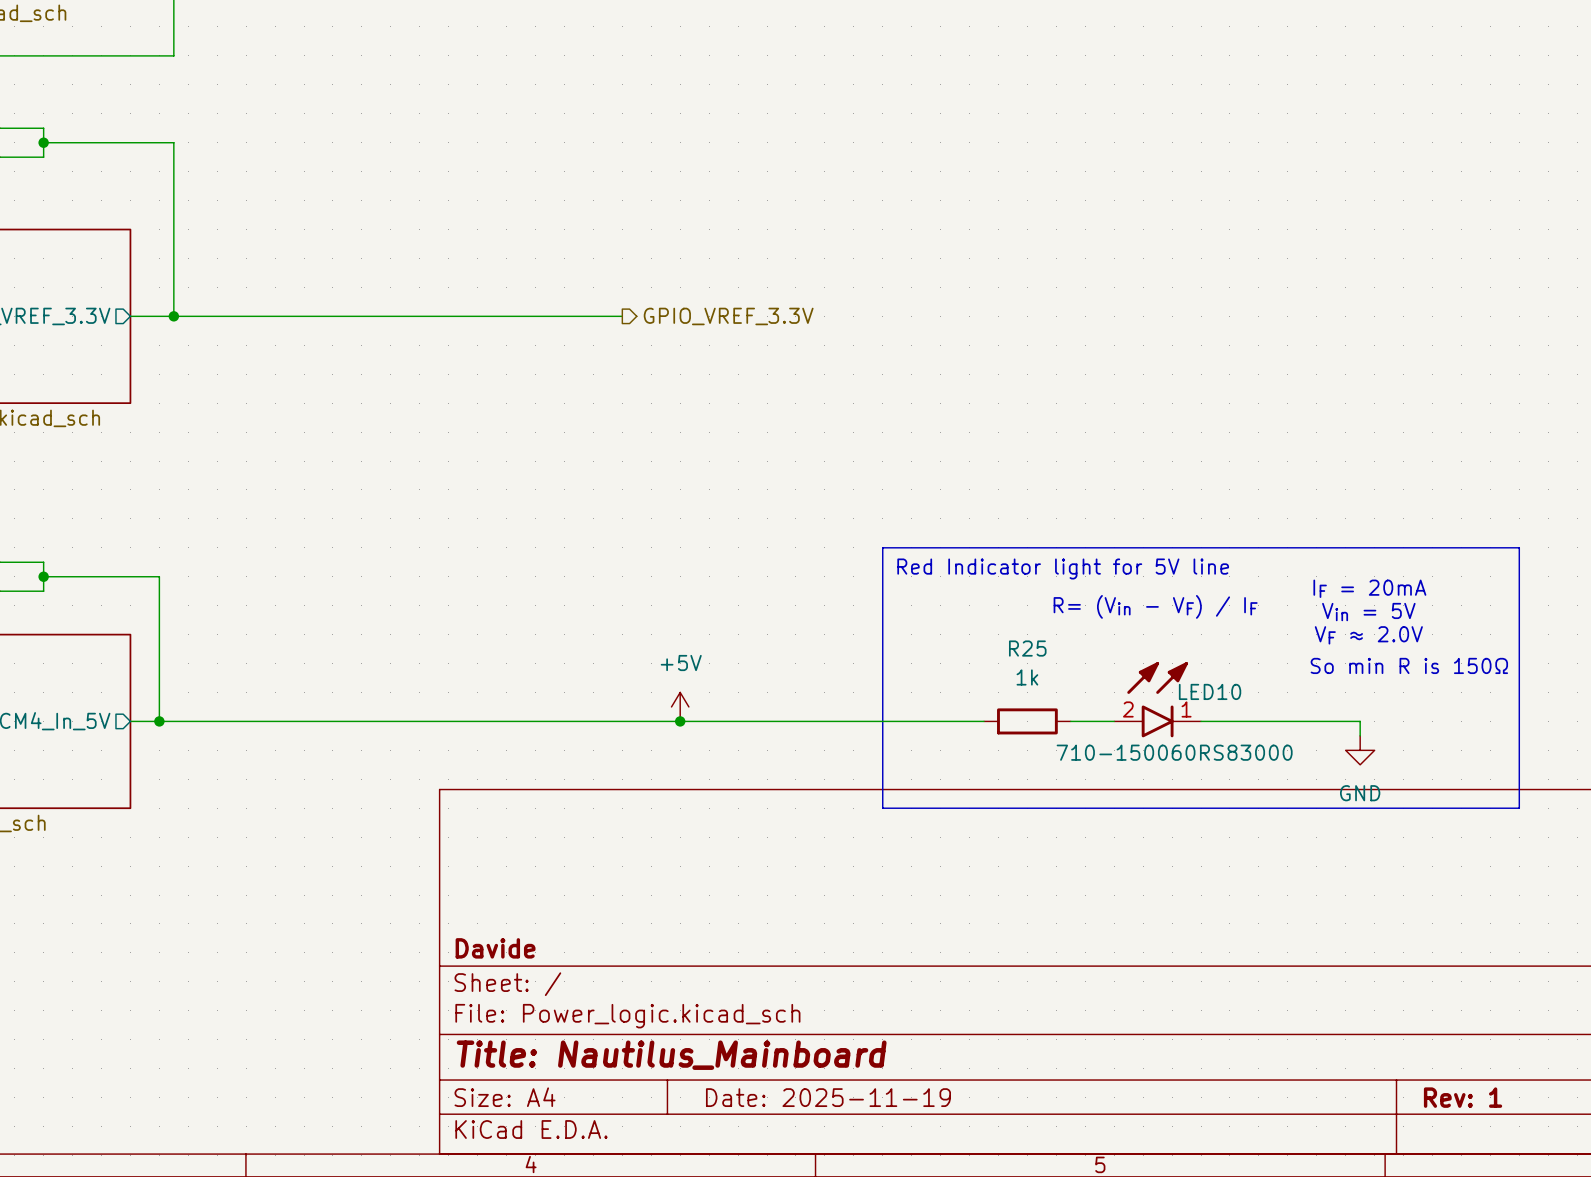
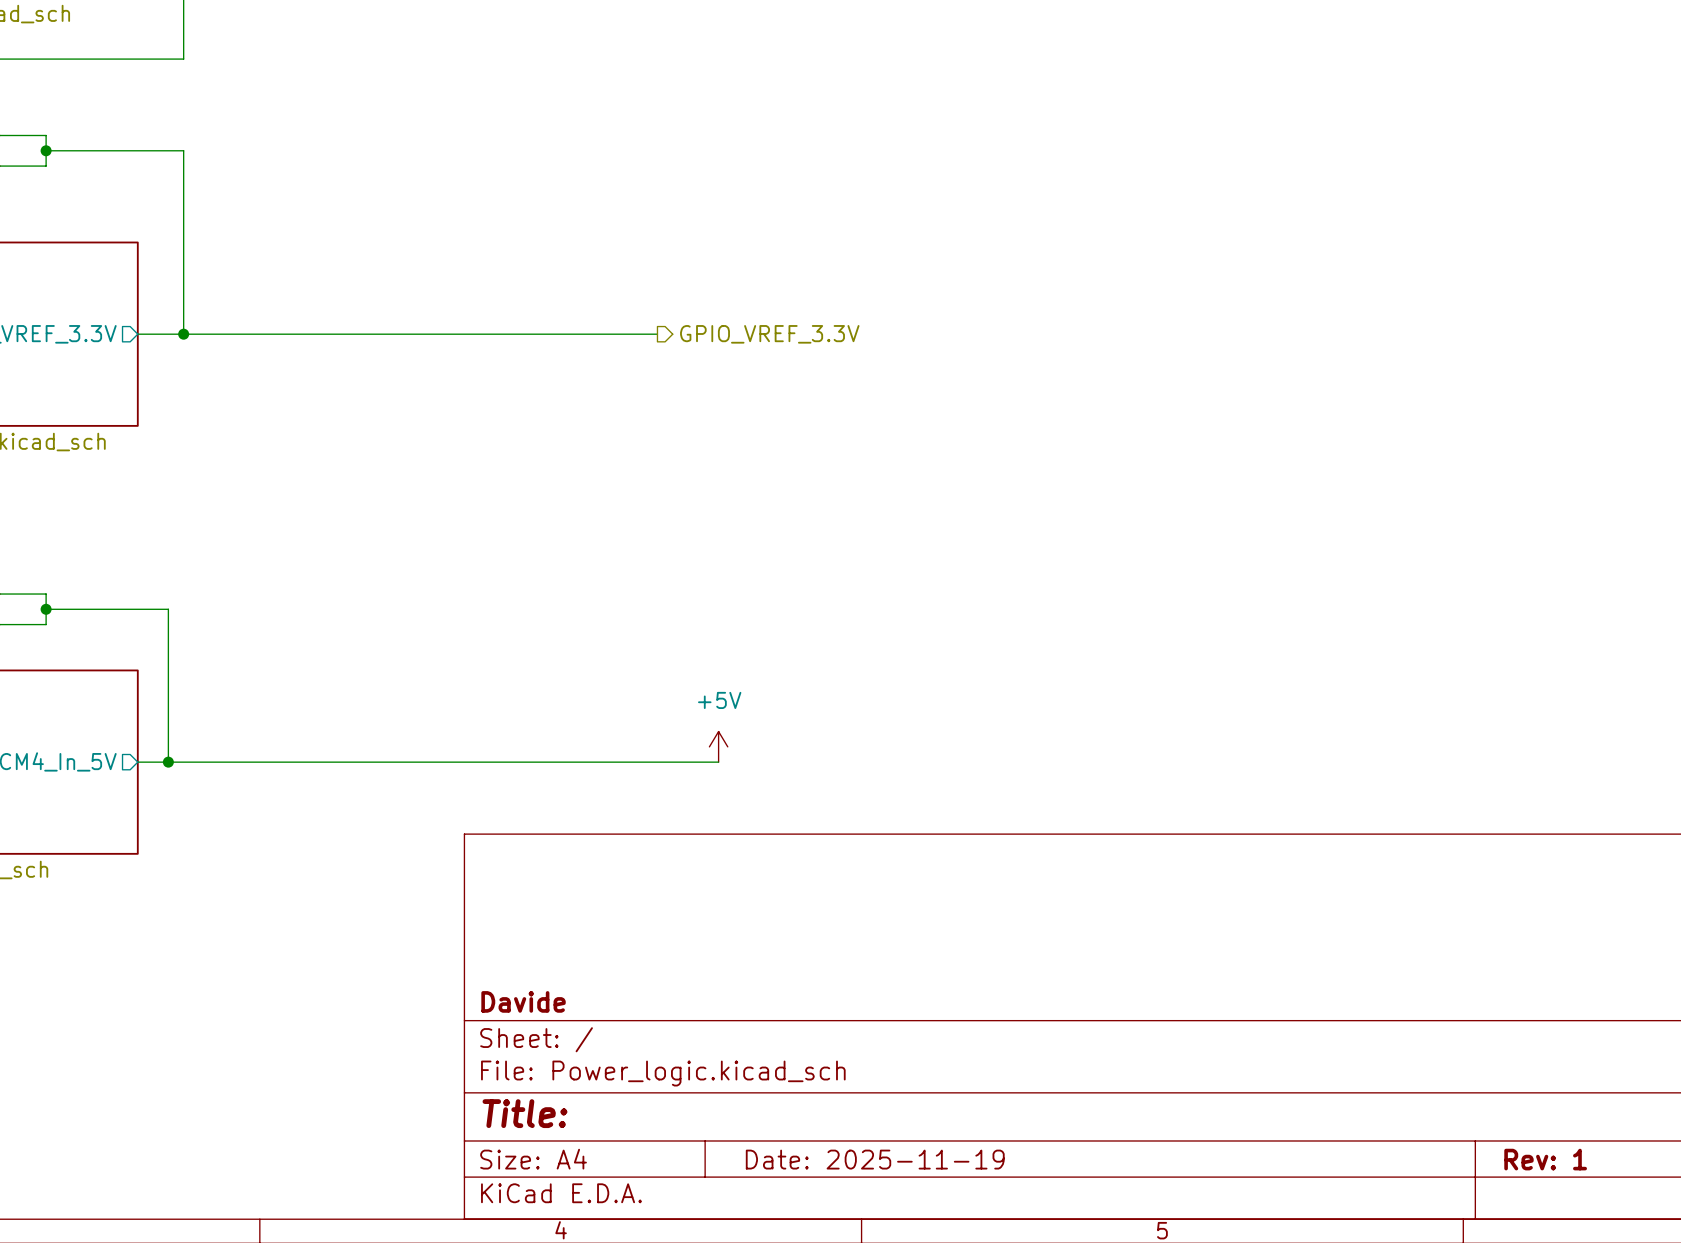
line: (882, 547) (1519, 547) (1519, 808) (882, 808) (882, 547) -> none
text: Red Indicator light for 5V line (1063, 568) -> none
text: IF = 20mA (1369, 588) -> none
text: R= (Vin - VF) / IF (1155, 606) -> none
text: Vin = 5V (1368, 612) -> none
text: VF ≈ 2.0V (1368, 635) -> none
text: So min R is 150Ω (1409, 665) -> none
LED10: 710-150060RS83000 (1157, 699) -> none
wire: (680, 721) (984, 721) -> none
junction: (680, 721) -> none
R25: 1k (1027, 721) -> none
wire: (1070, 721) (1114, 721) -> none
wire: (1201, 721) (1360, 721) (1360, 735) -> none
power symbol: GND (1360, 750) -> none
title block: Title: Nautilus_Mainboard (671, 1055) -> Title: (524, 1113)

